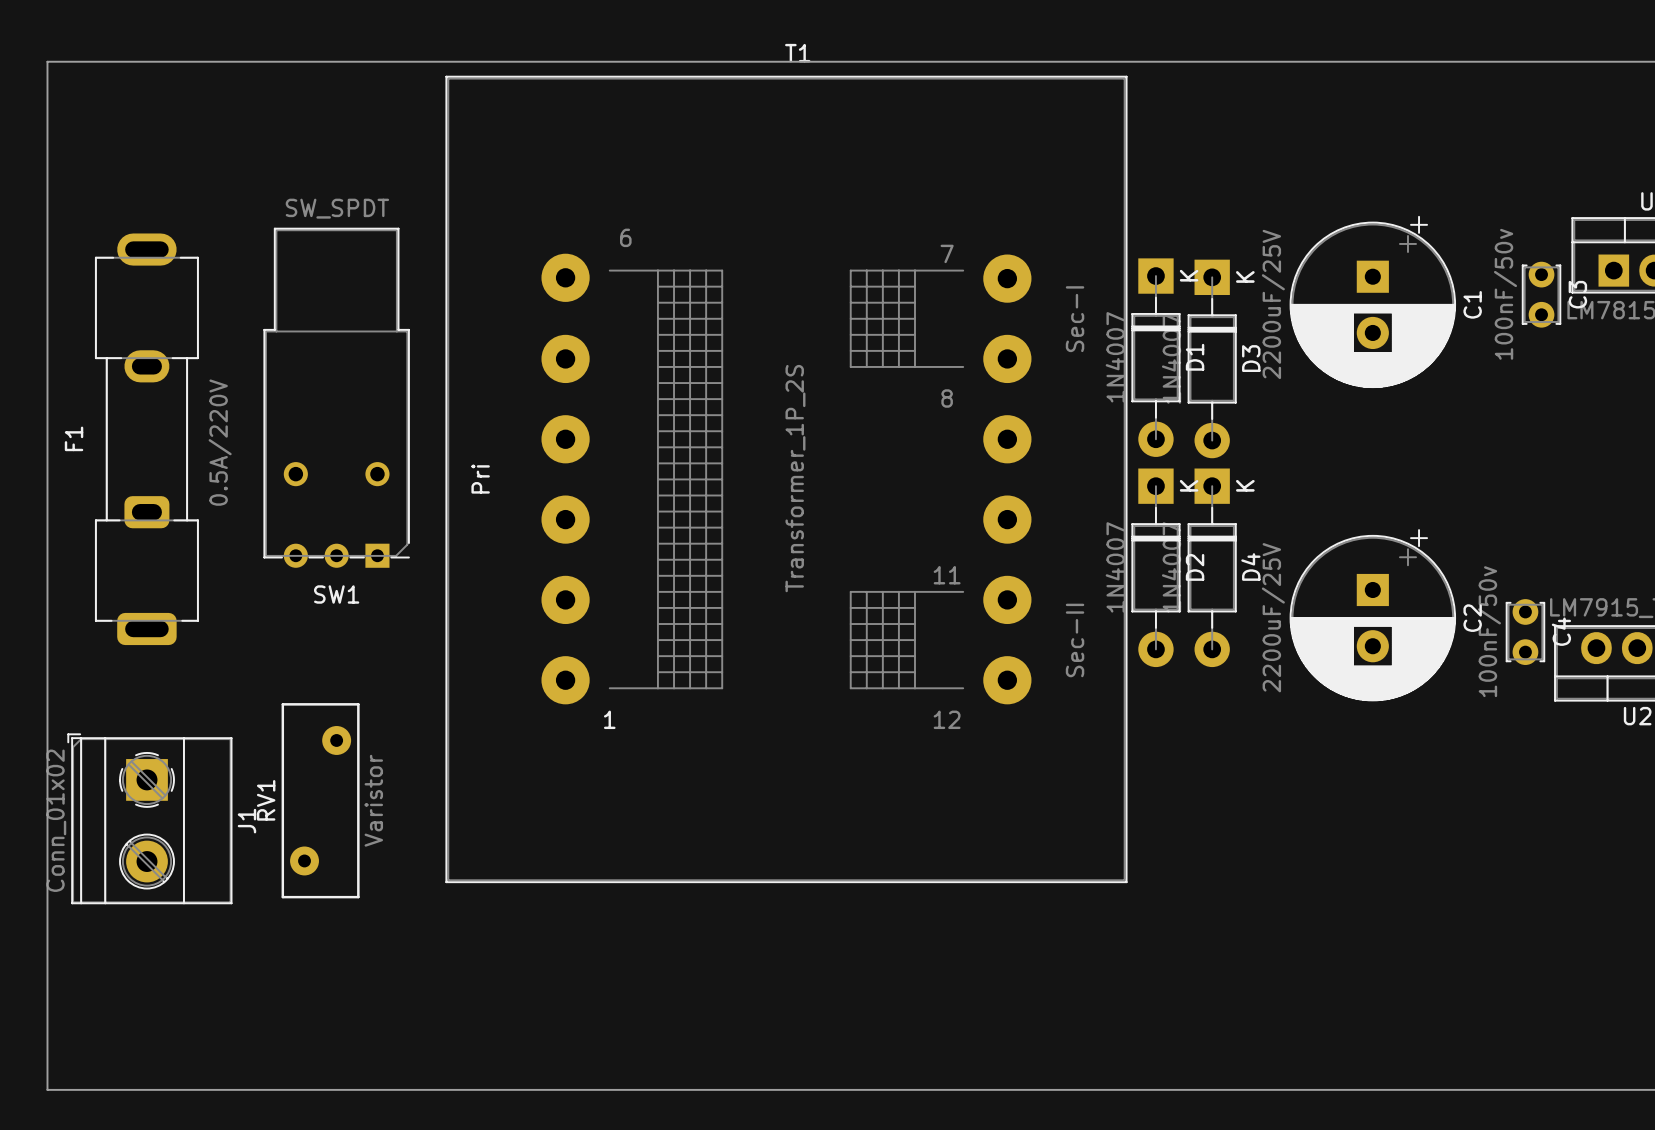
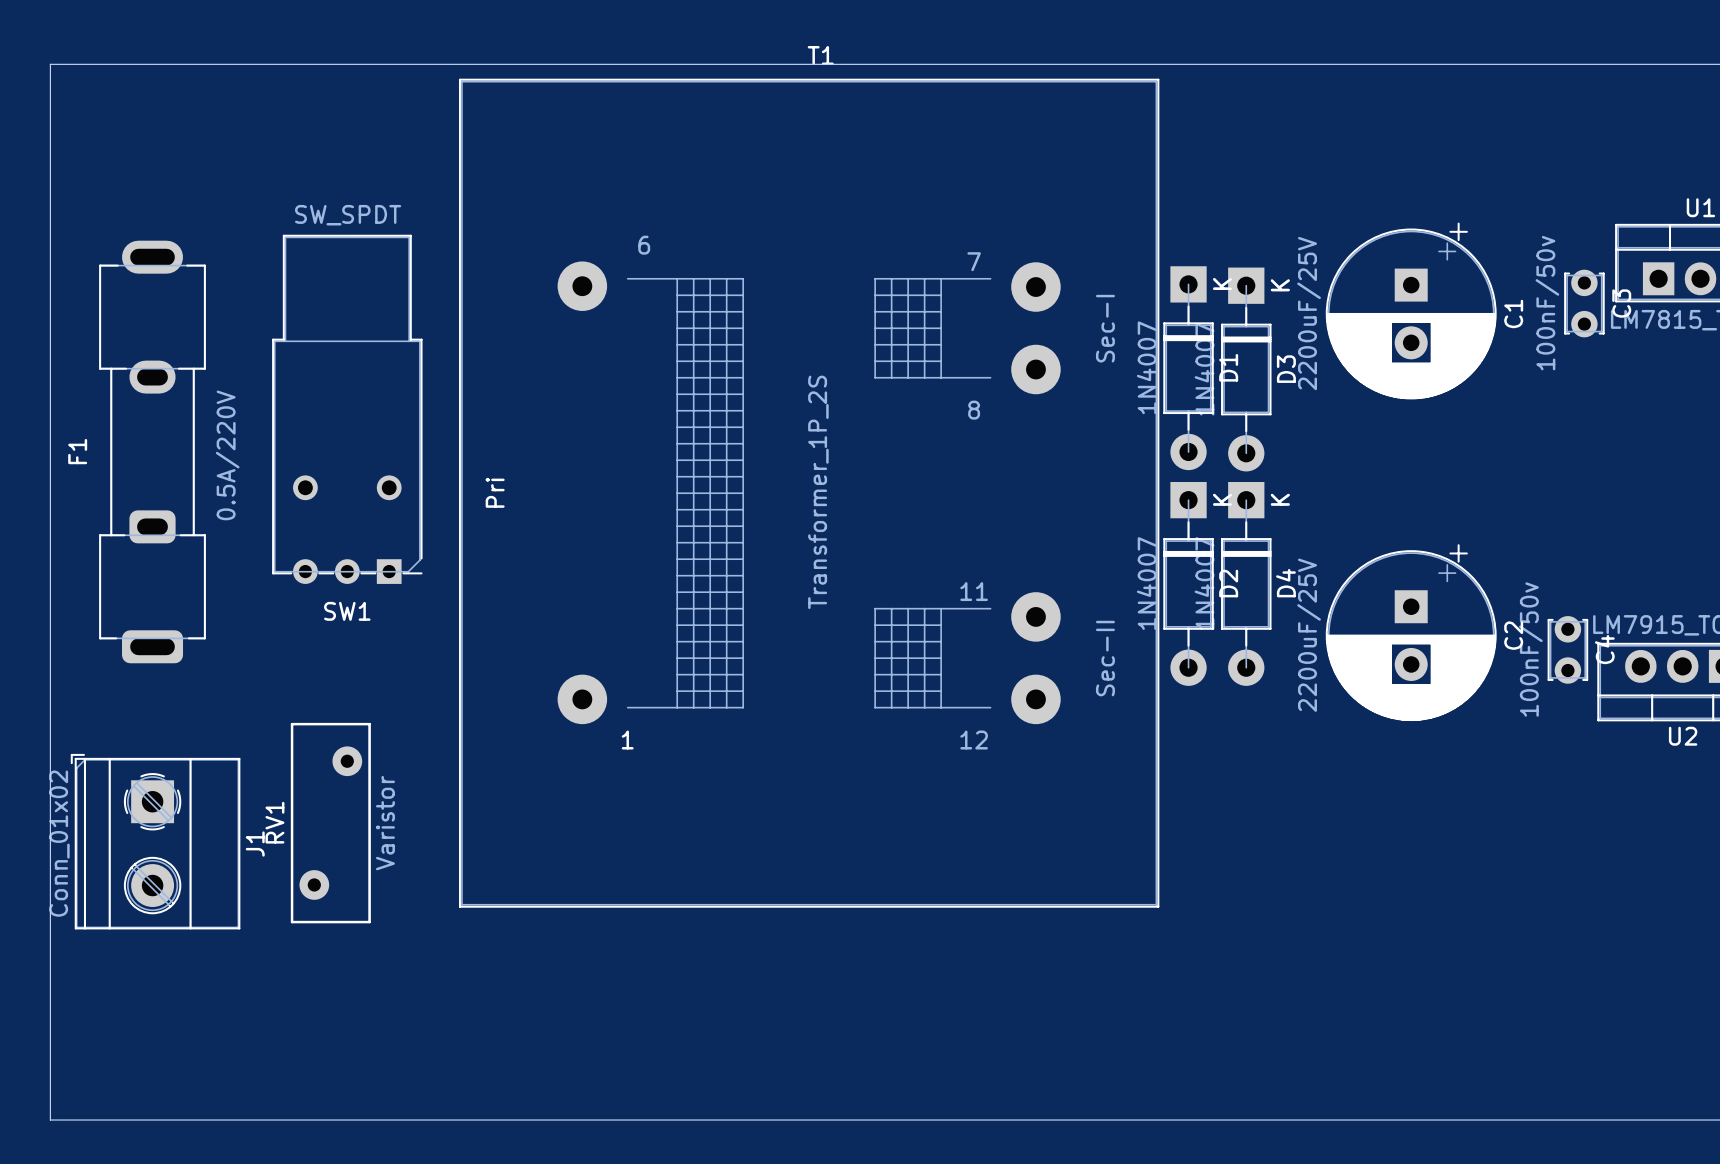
T1 footprint: [445, 75, 1128, 884] -> [458, 78, 1160, 908]

